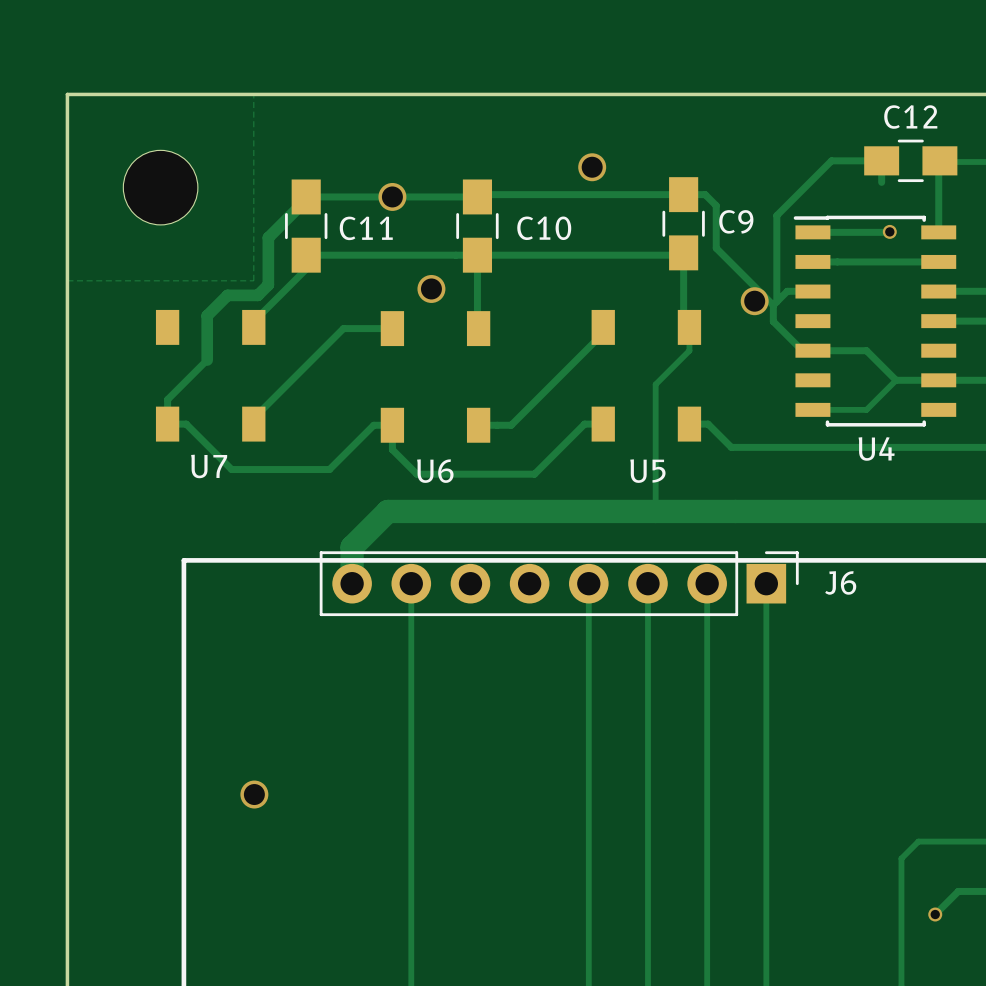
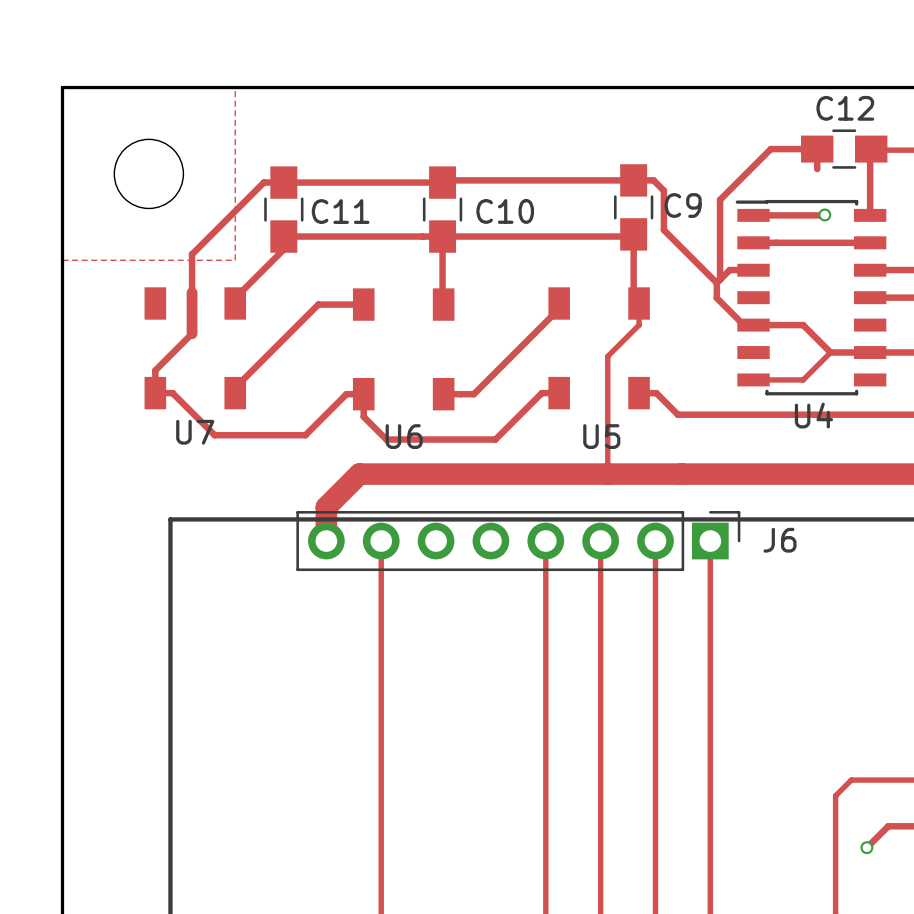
via: (592, 167) -> none
track: (306, 196) (306, 199) (268, 237) (268, 284) (257, 295) (227, 295) (207, 315) -> (283, 182) (263, 182) (192, 254) (192, 292)
via: (392, 196) -> none
via: (431, 288) -> none
via: (754, 301) -> none
via: (254, 794) -> none

